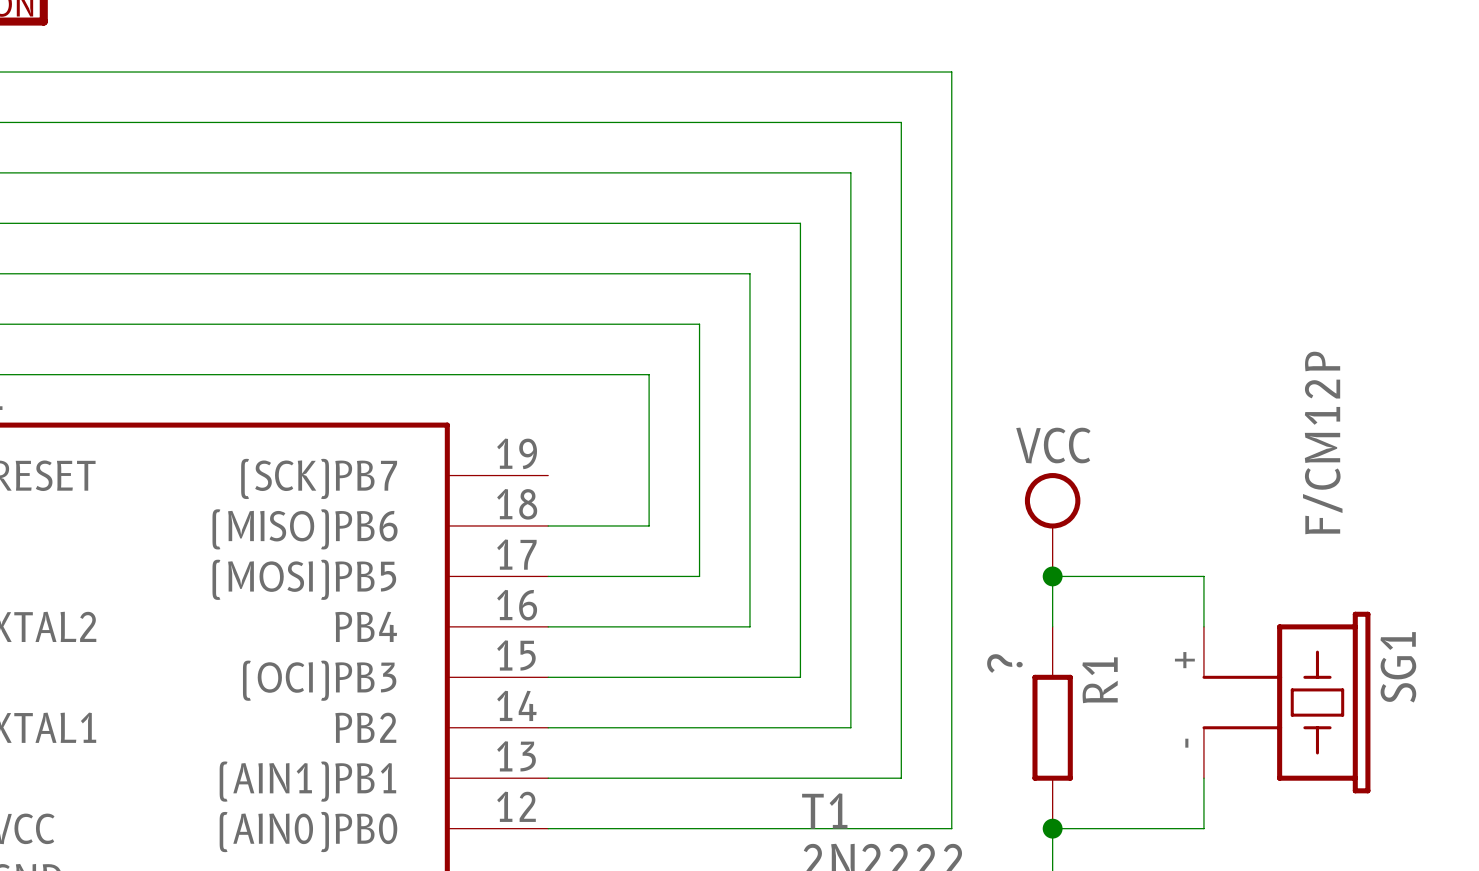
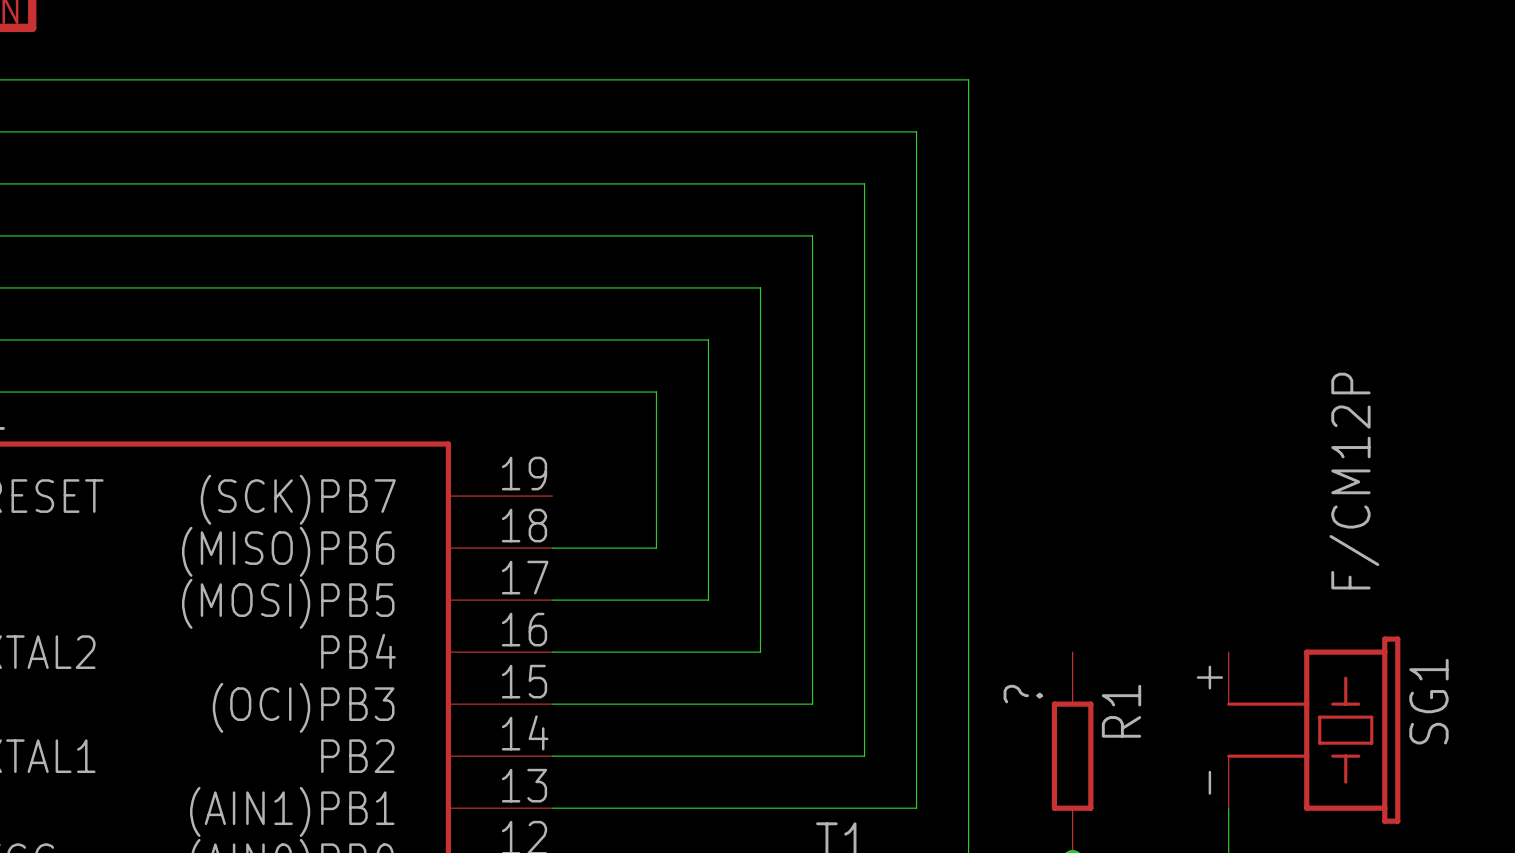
power symbol: VCC (1052, 524) -> none
junction: (1052, 576) -> none
wire: (1052, 626) (1052, 576) (1203, 576) (1203, 626) -> none

